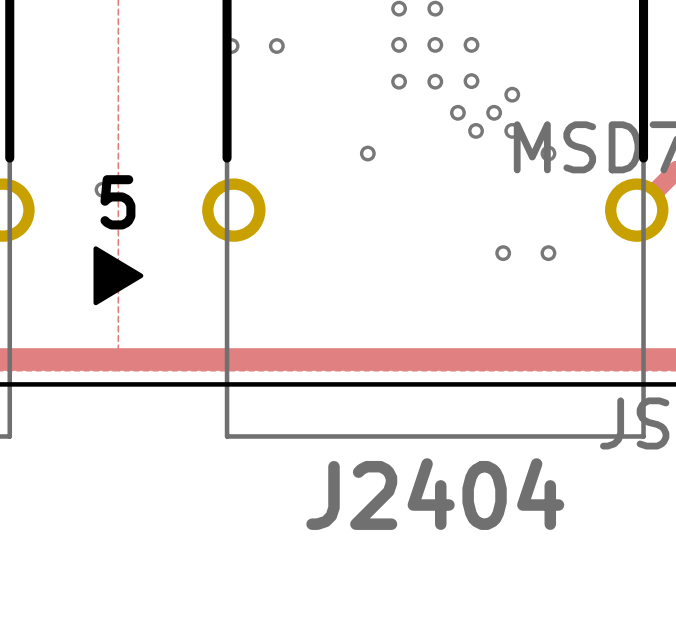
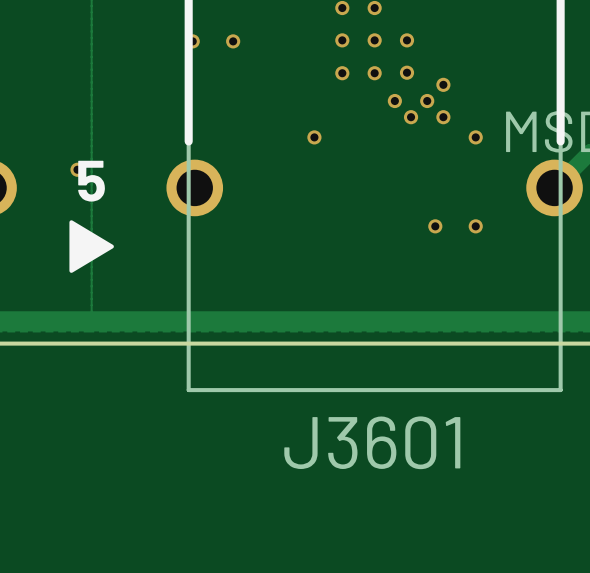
J2404 name: J2404 (435, 494) -> J3601 (372, 442)

